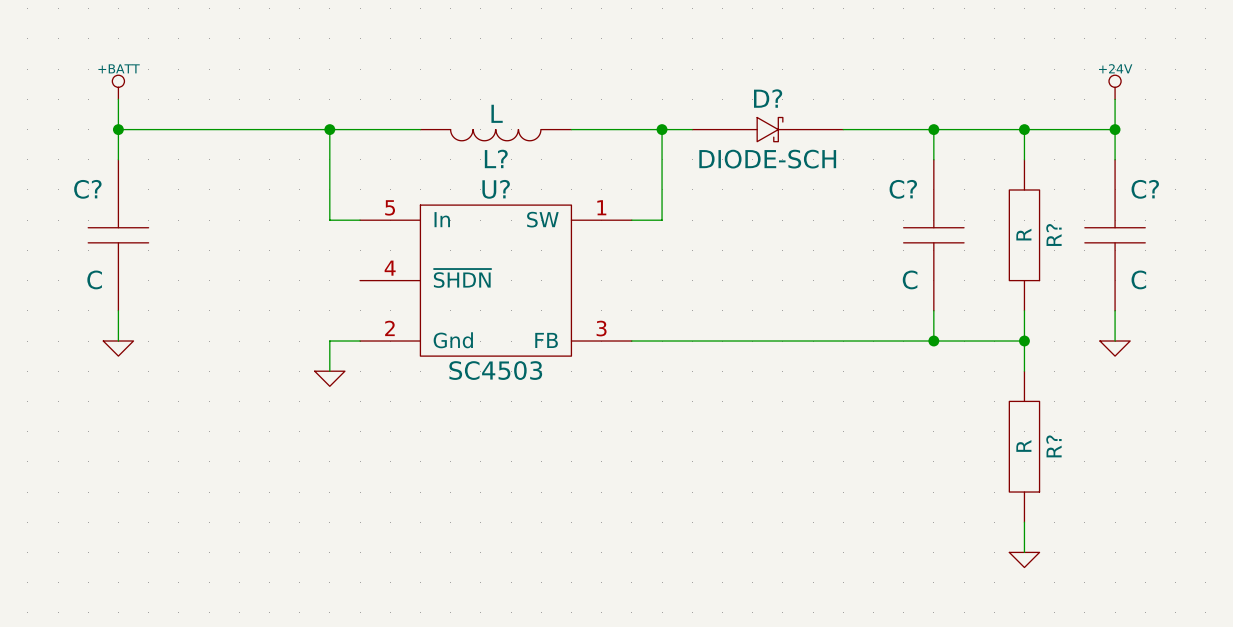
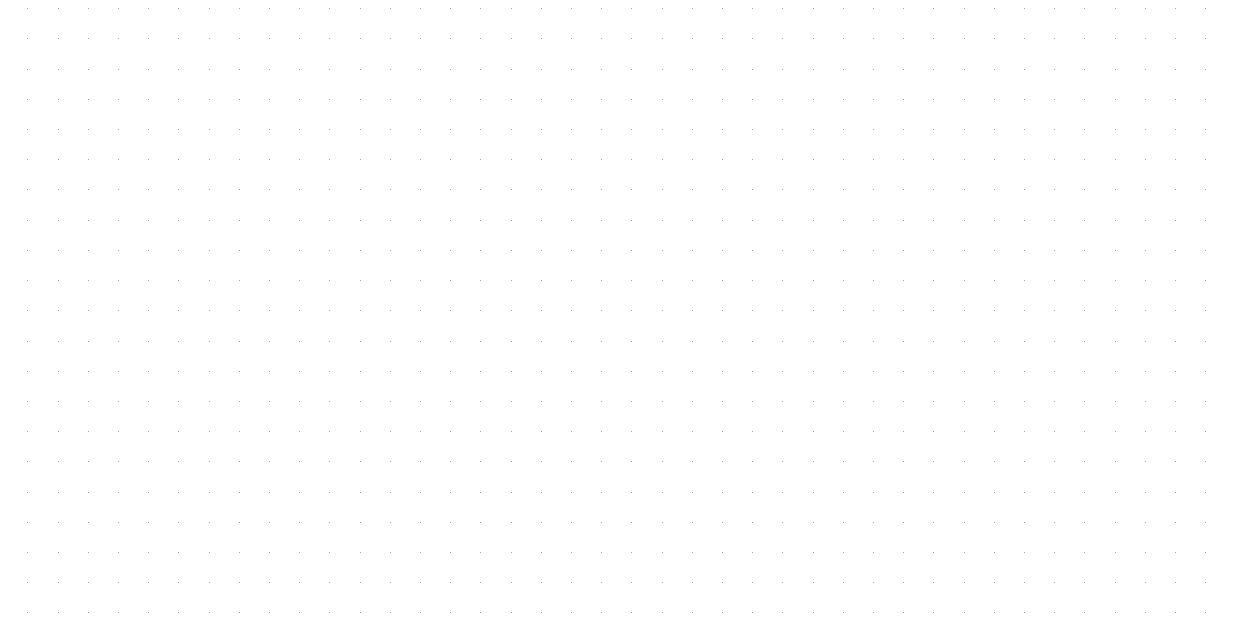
power symbol: +BATT (118, 87) -> none
power symbol: +24V (1115, 87) -> none
wire: (118, 99) (118, 159) -> none
wire: (1115, 99) (1115, 159) -> none
wire: (118, 129) (420, 129) -> none
junction: (118, 129) -> none
wire: (329, 129) (329, 220) (360, 220) -> none
junction: (329, 129) -> none
wire: (571, 129) (692, 129) -> none
wire: (662, 129) (662, 220) (631, 220) -> none
junction: (662, 129) -> none
D?: DIODE-SCH (767, 129) -> none
wire: (843, 129) (1115, 129) -> none
wire: (933, 129) (933, 159) -> none
junction: (933, 129) -> none
wire: (1024, 129) (1024, 159) -> none
junction: (1024, 129) -> none
junction: (1115, 129) -> none
L?: L (495, 135) -> none
C?: C (118, 235) -> none
C?: C (933, 235) -> none
R?: R (1024, 235) -> none
C?: C (1115, 235) -> none
U?: SC4503 (495, 280) -> none
wire: (118, 310) (118, 341) -> none
wire: (933, 310) (933, 341) -> none
wire: (1024, 310) (1024, 371) -> none
wire: (1115, 310) (1115, 341) -> none
wire: (360, 341) (329, 341) (329, 371) -> none
wire: (631, 341) (1024, 341) -> none
junction: (933, 341) -> none
junction: (1024, 341) -> none
power symbol: (118, 348) -> none
power symbol: (1115, 348) -> none
power symbol: (329, 378) -> none
R?: R (1024, 446) -> none
wire: (1024, 522) (1024, 552) -> none
power symbol: (1024, 559) -> none

